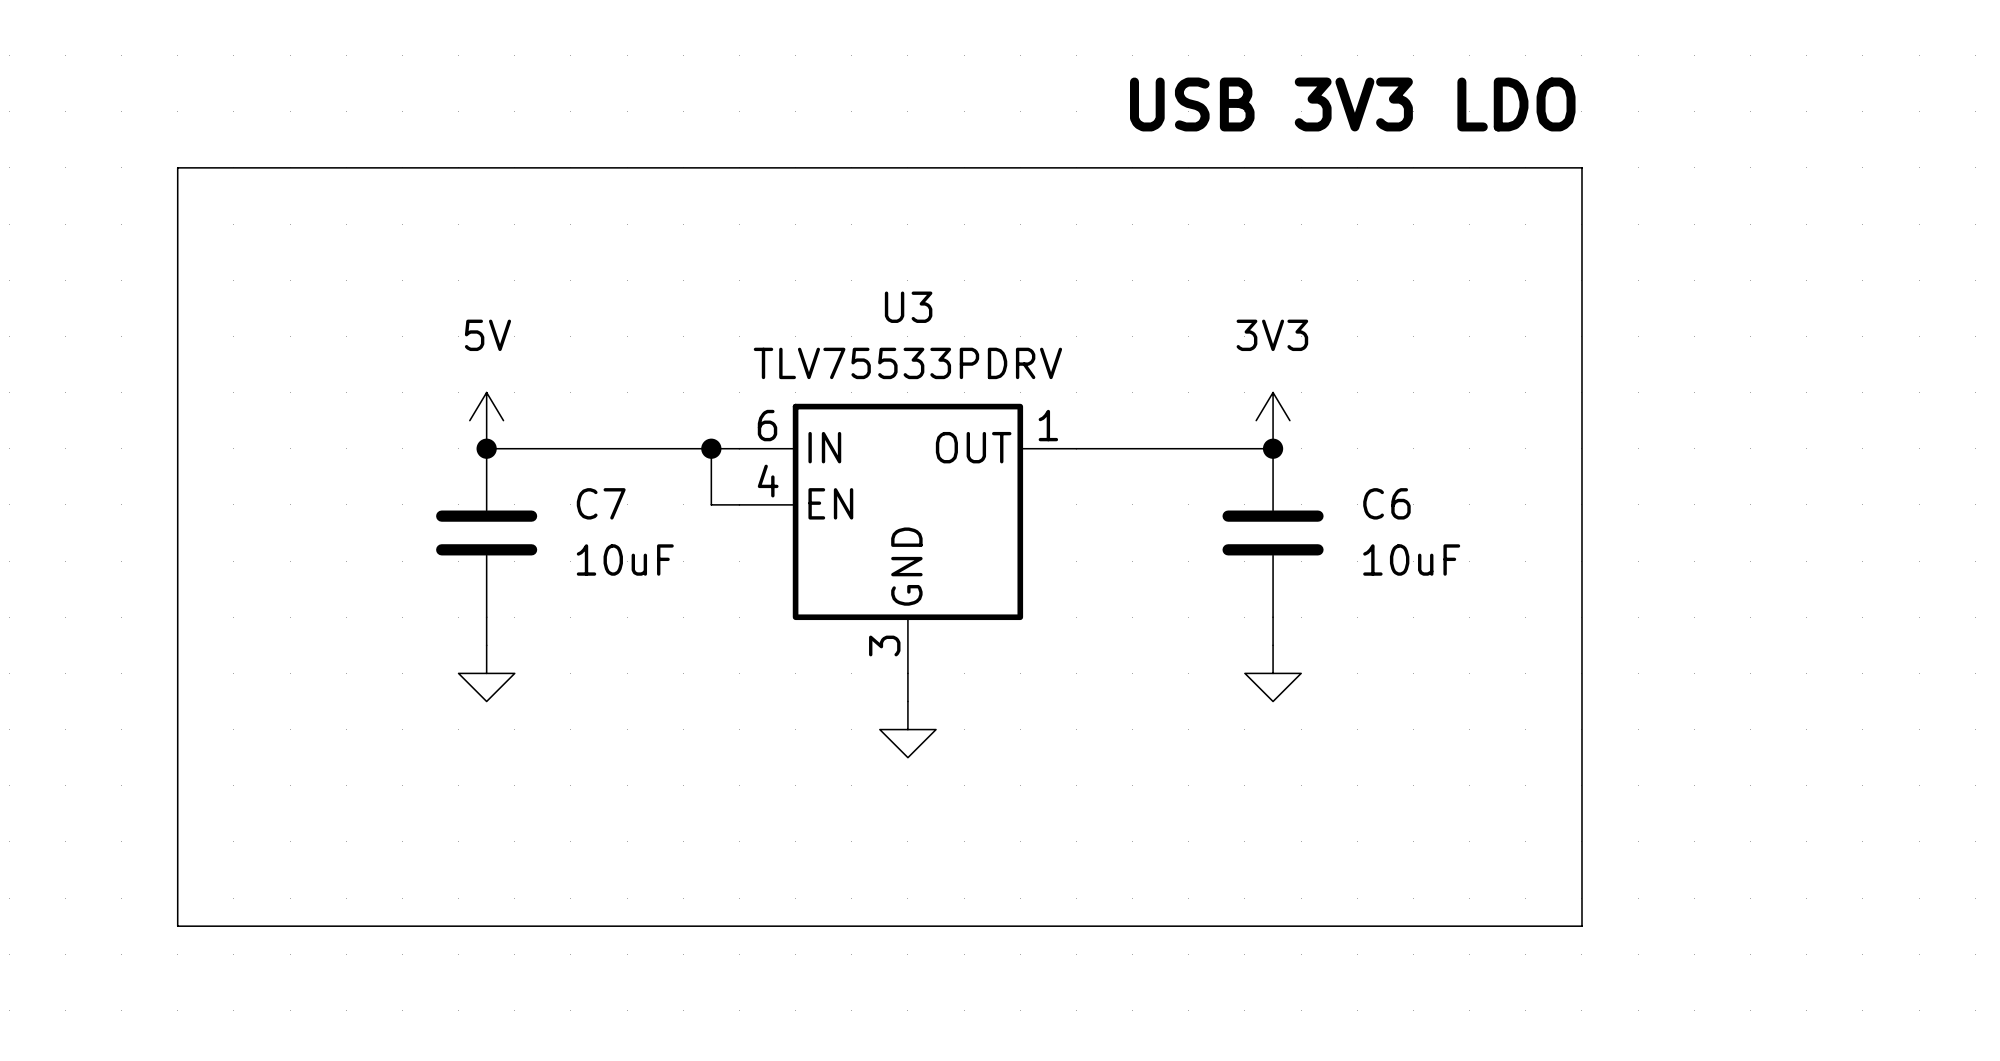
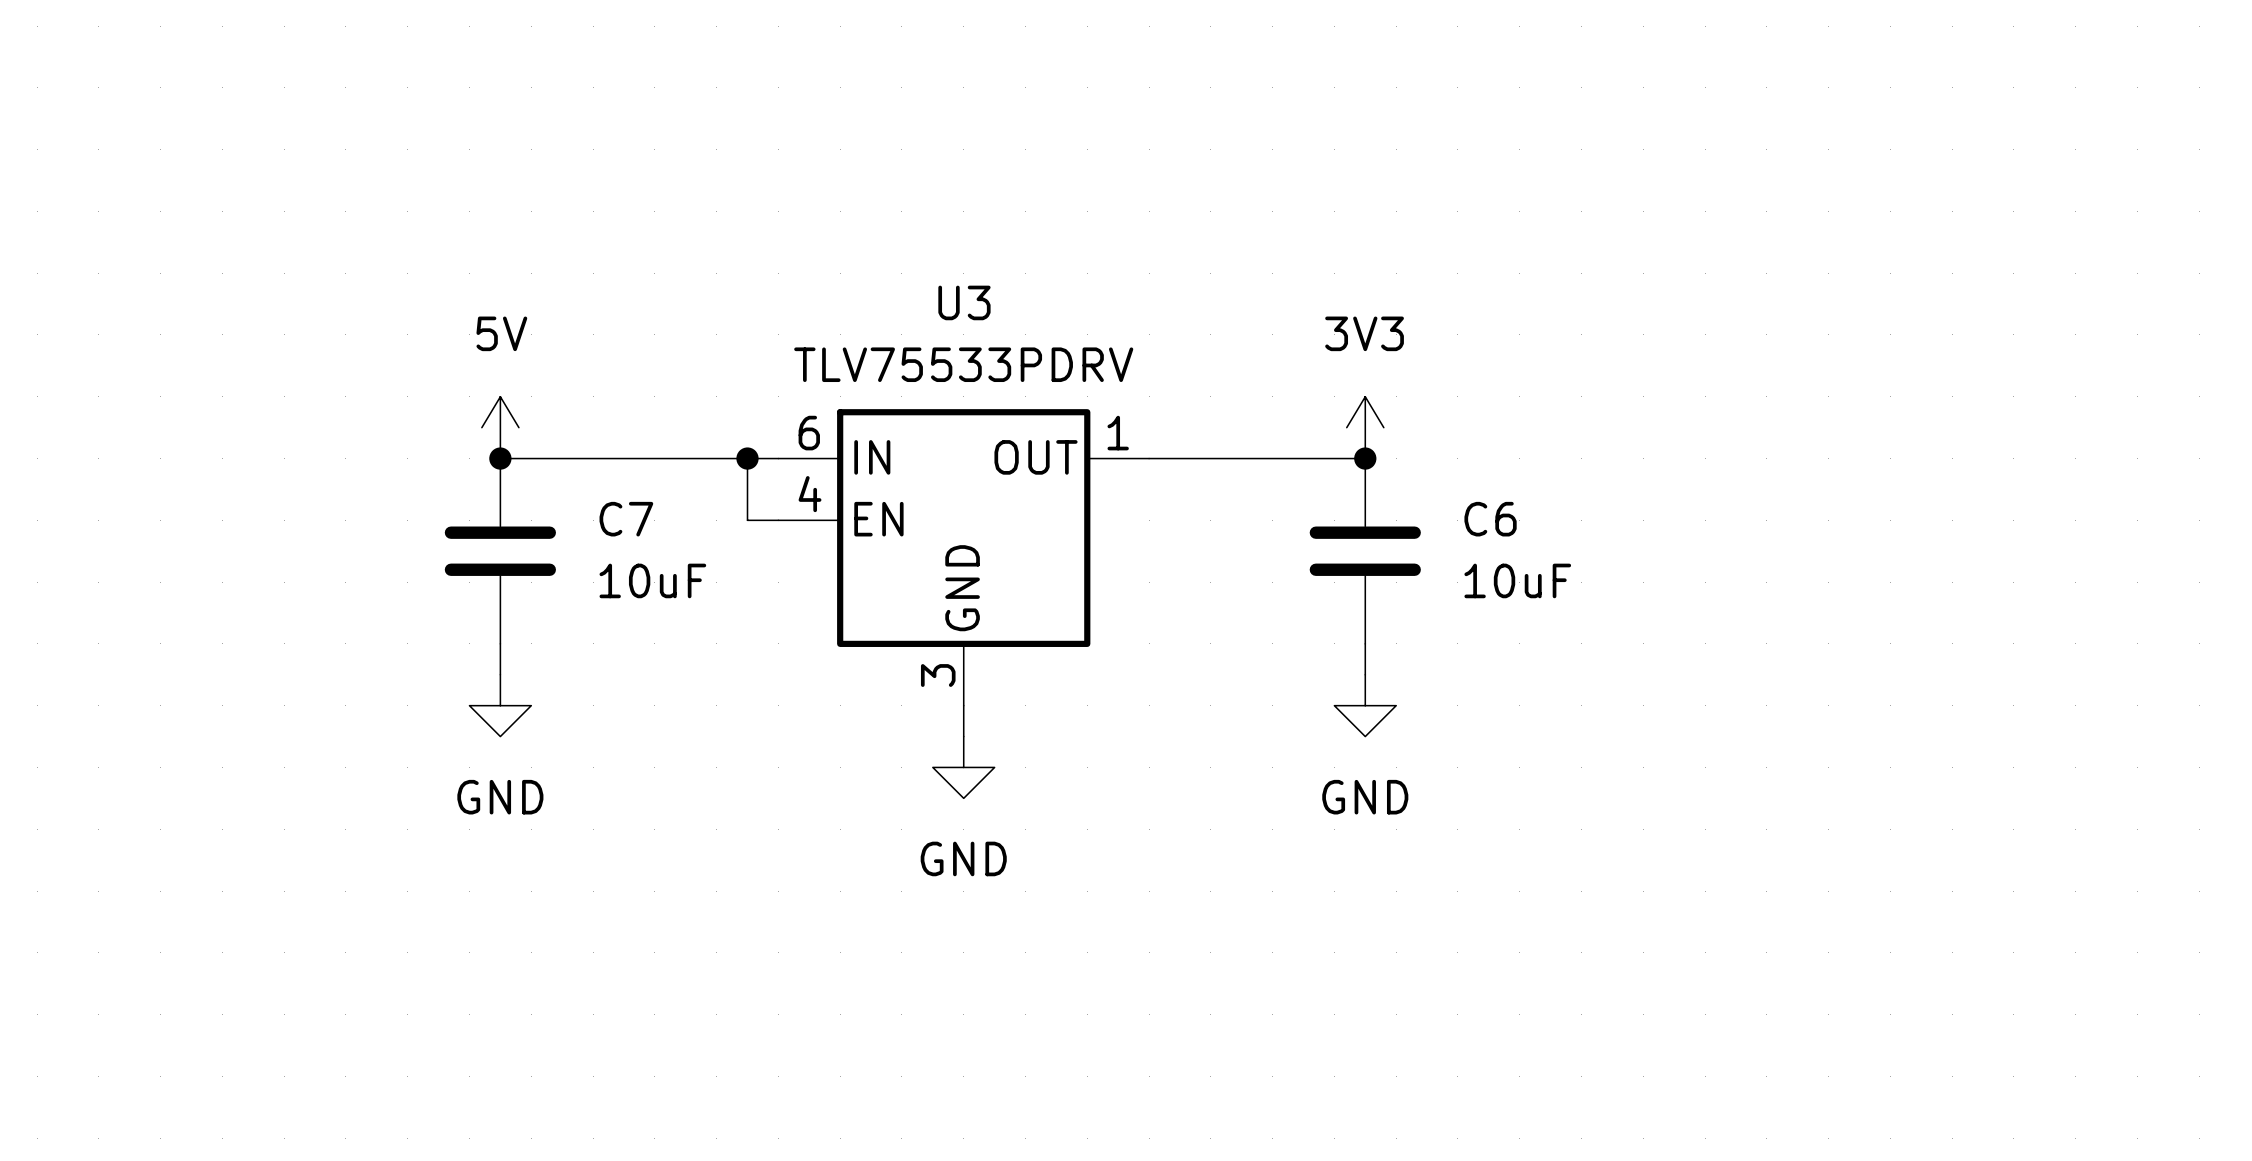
text: USB 3V3 LDO (1352, 104) -> none
line: (177, 167) (1581, 167) (1581, 926) (177, 926) (177, 167) -> none
power symbol text: none -> GND (500, 797)
power symbol text: none -> GND (1365, 797)
power symbol text: none -> GND (963, 858)

